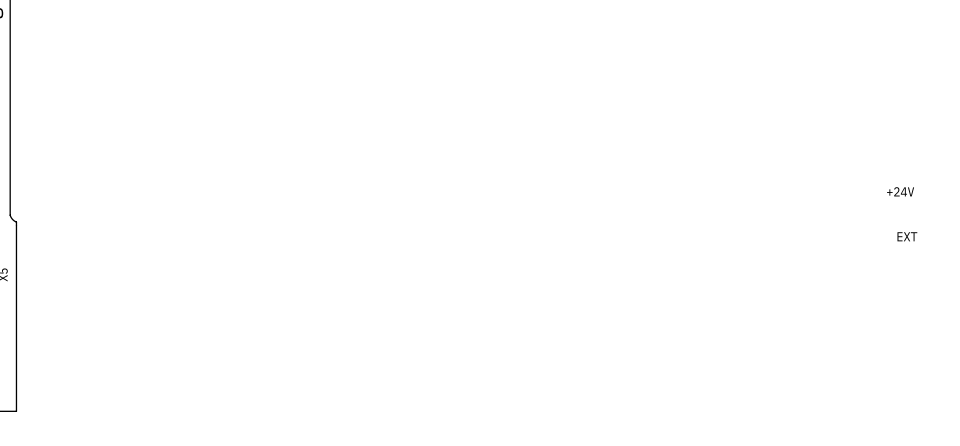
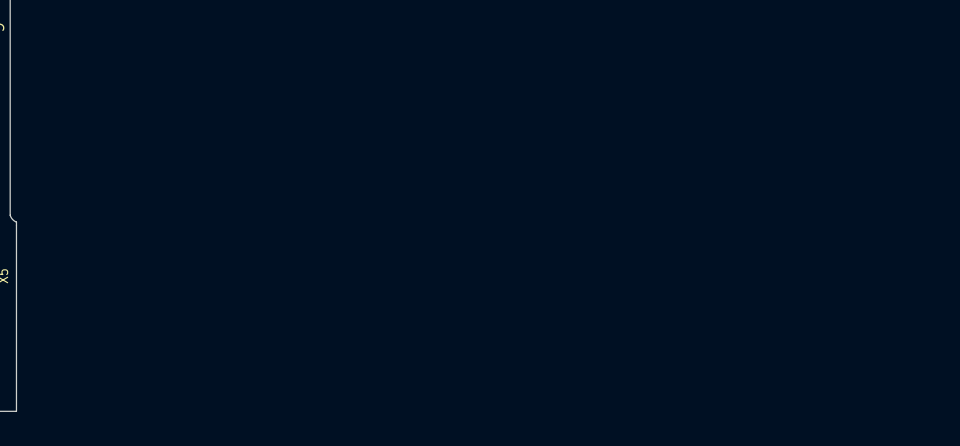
text: +24V (900, 191) -> none
text: EXT (907, 236) -> none

